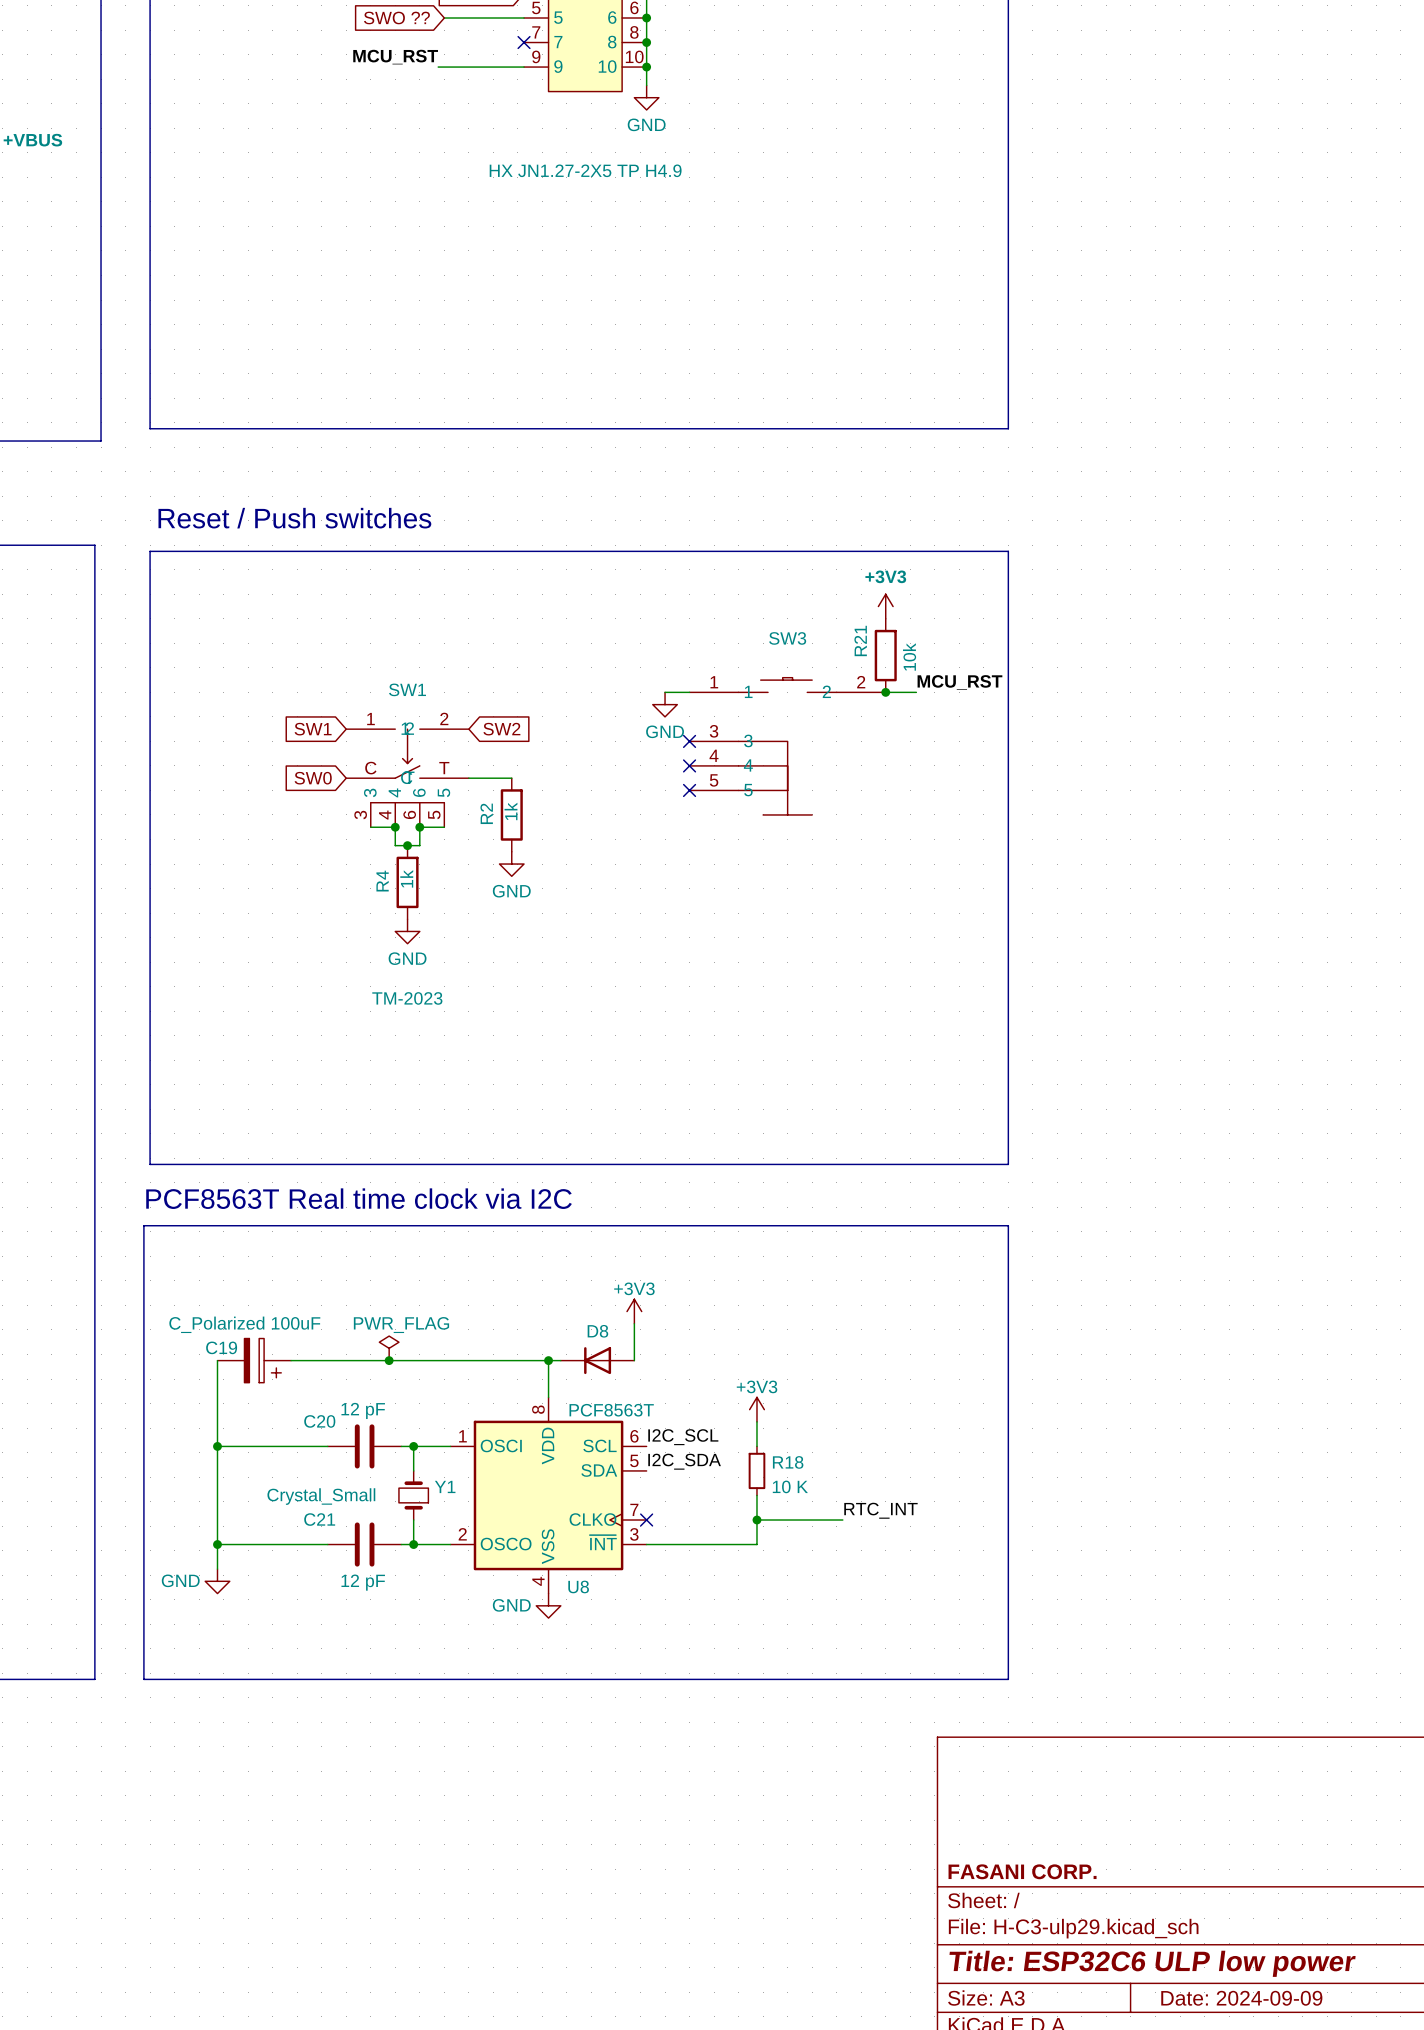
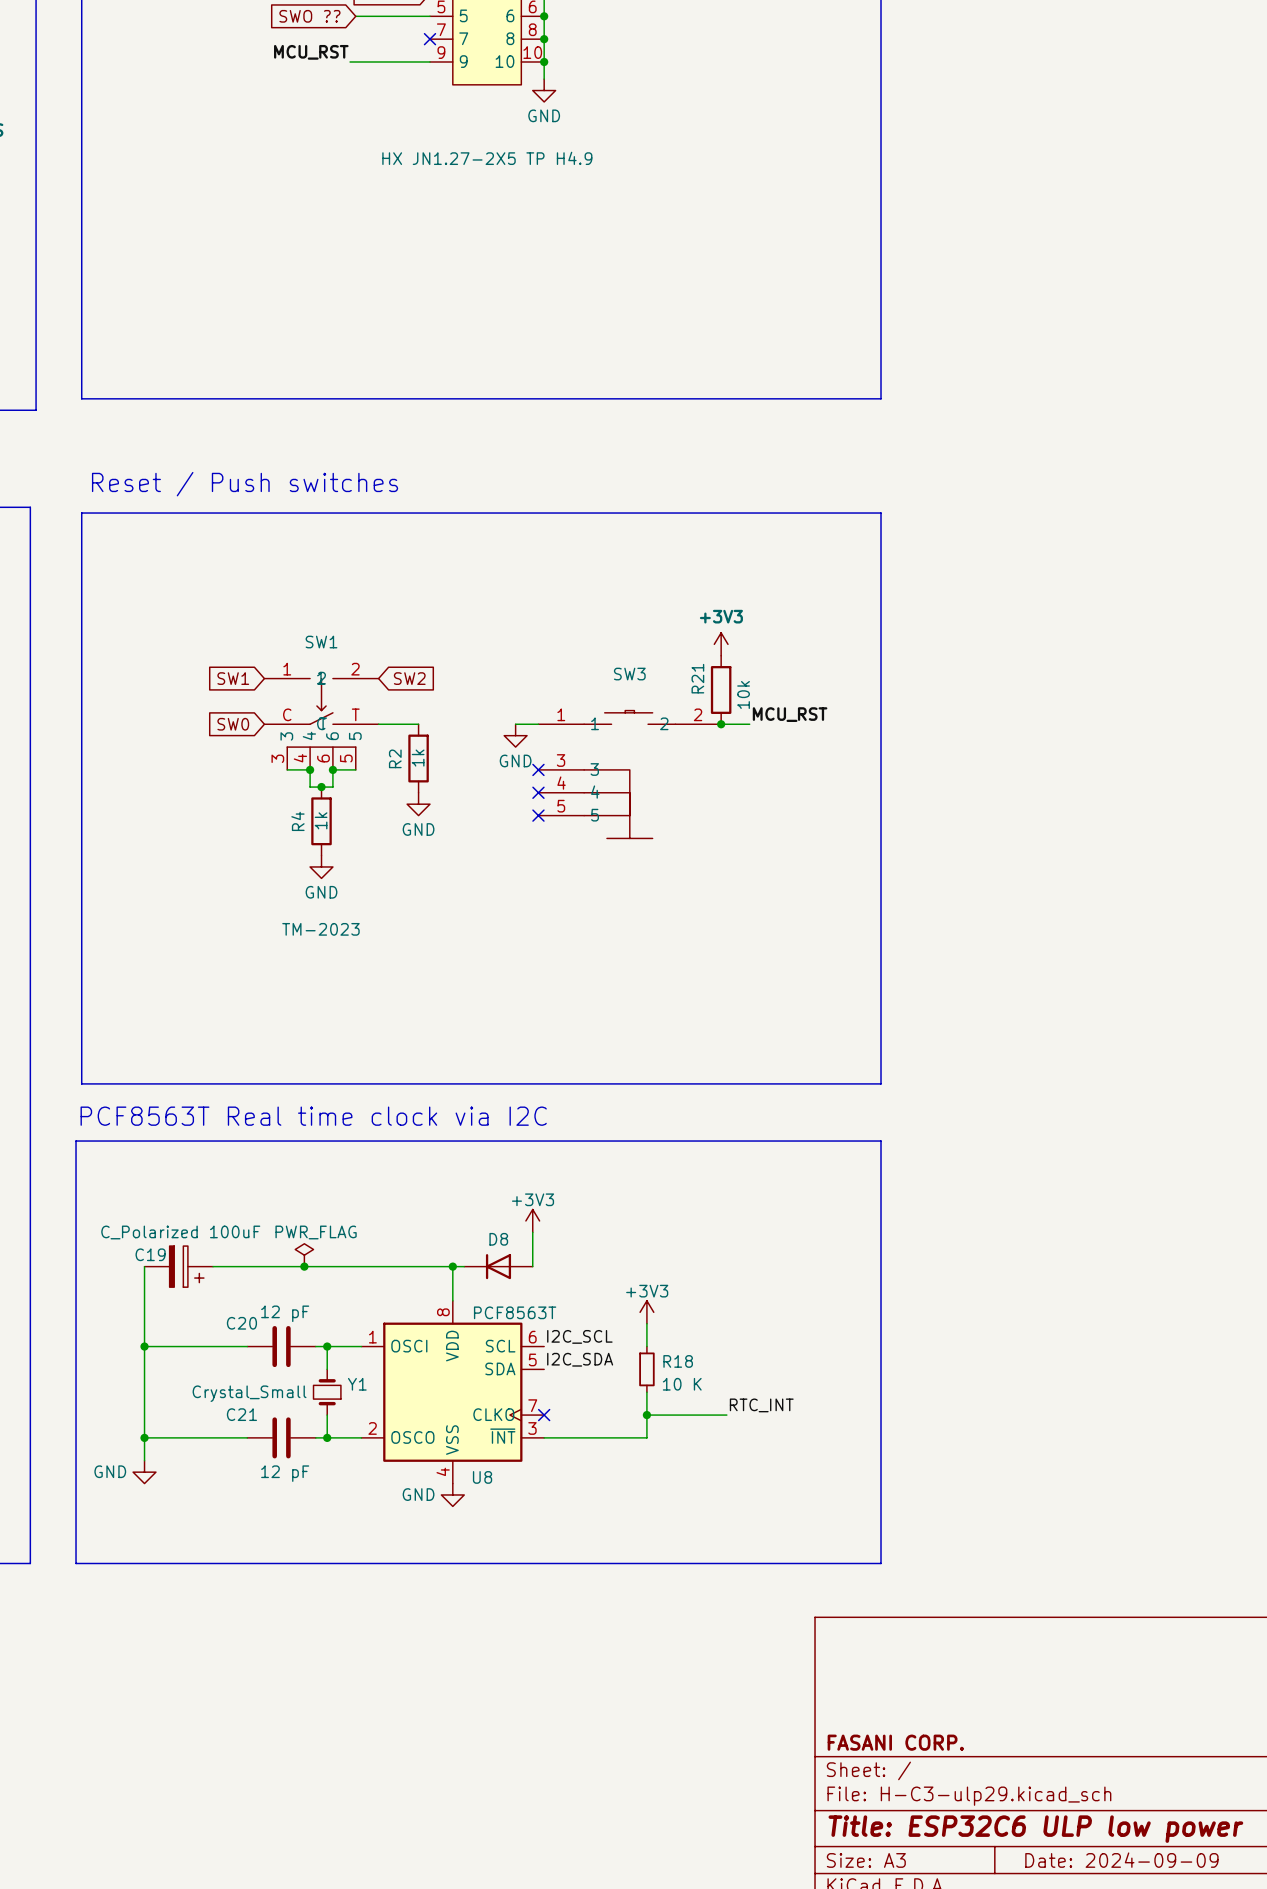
power symbol position: +3V3 (885, 606) -> +3V3 (721, 644)
R21 position: (885, 655) -> (721, 690)
label position: MCU_RST (959, 682) -> MCU_RST (790, 714)
wire: (665, 692) (689, 692) -> (515, 724) (538, 724)
wire: (885, 692) (916, 692) -> (721, 724) (749, 724)
junction: (885, 692) -> none
power symbol position: GND (665, 704) -> GND (515, 735)
no-connect mark: (689, 741) -> none
SW3 position: (787, 746) -> (629, 774)
no-connect mark: (689, 765) -> none
junction: none -> (721, 724)
no-connect mark: (689, 790) -> none
no-connect mark: none -> (538, 769)
no-connect mark: none -> (538, 792)
no-connect mark: none -> (538, 815)

